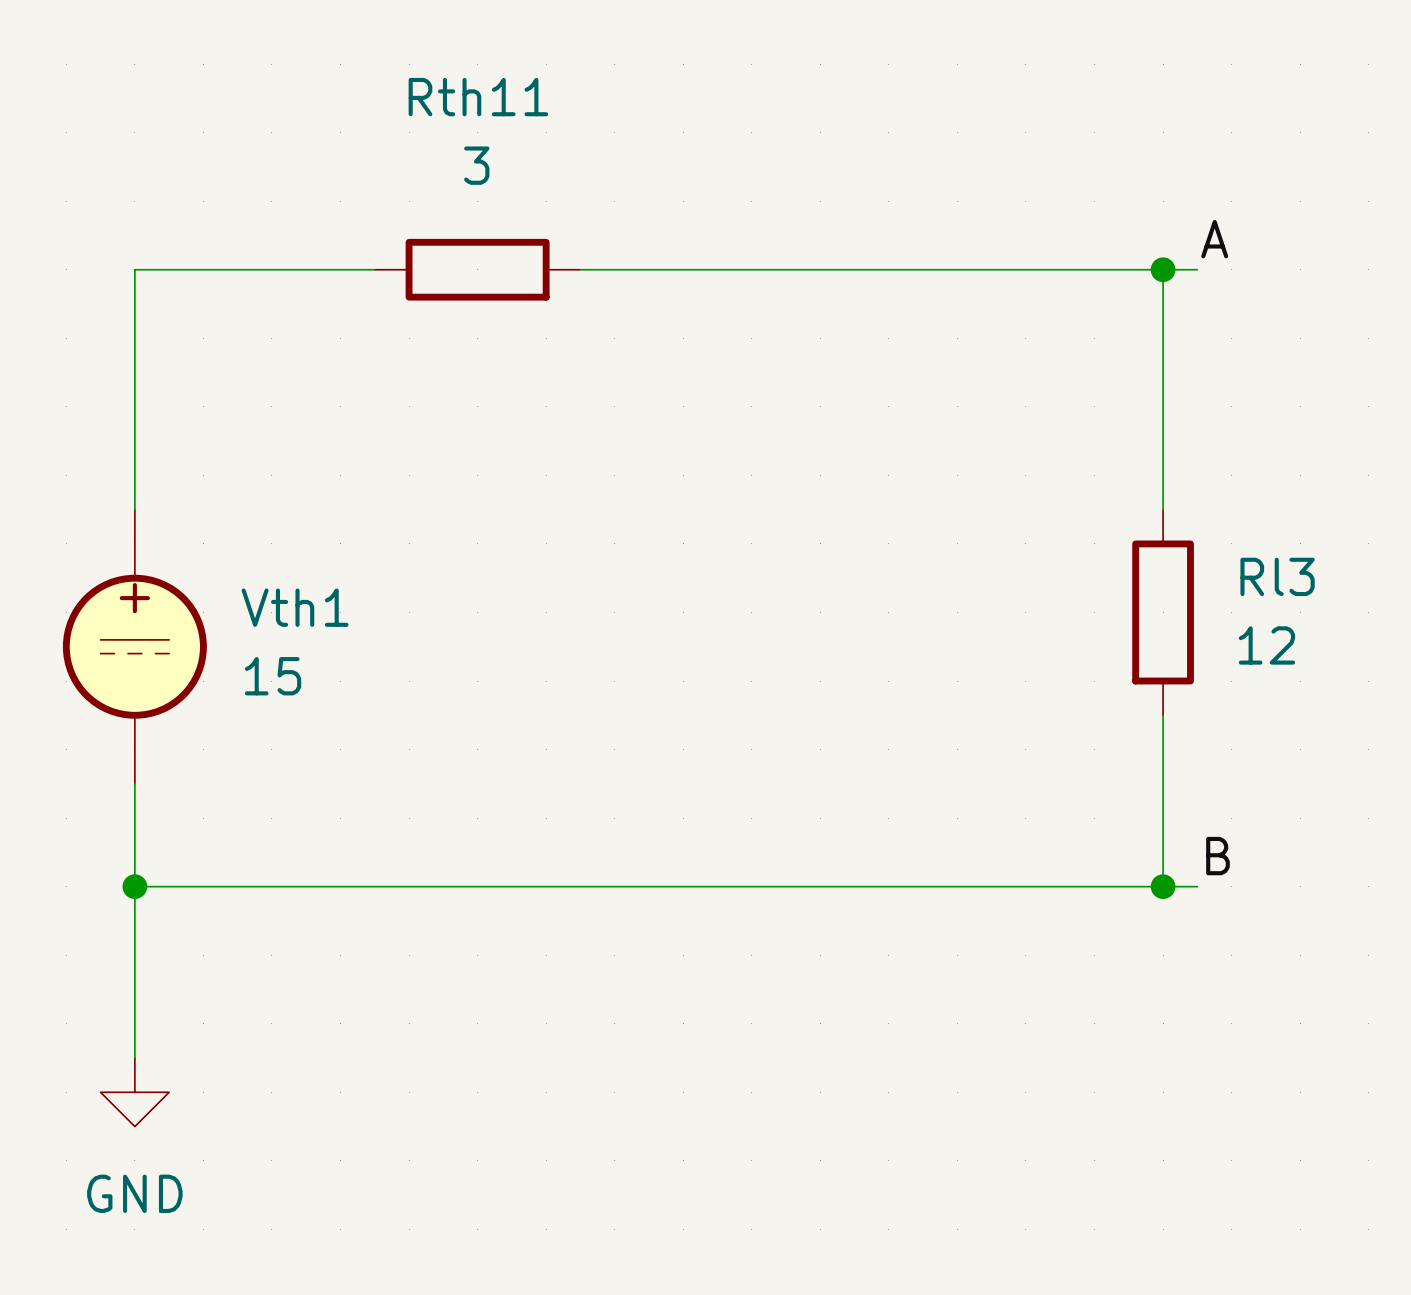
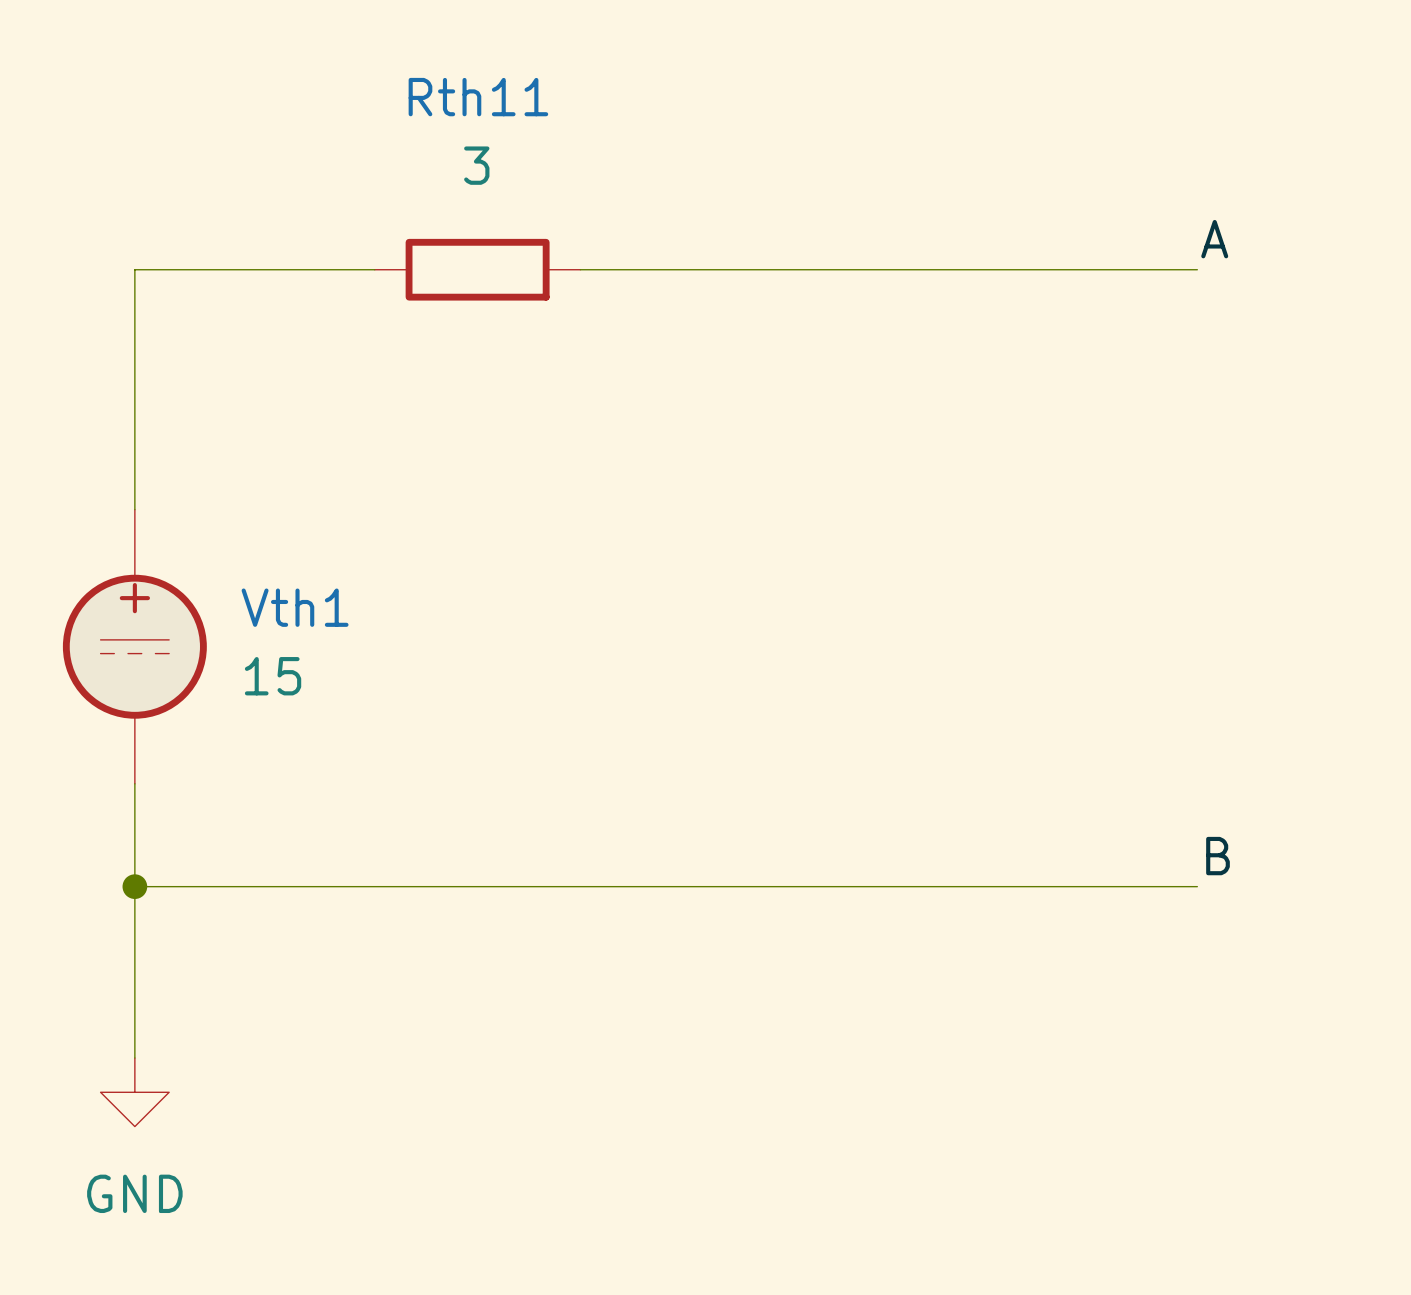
wire: (1163, 269) (1163, 509) -> none
junction: (1163, 269) -> none
Rl3: 12 (1163, 612) -> none
wire: (1163, 715) (1163, 886) -> none
junction: (1163, 886) -> none

